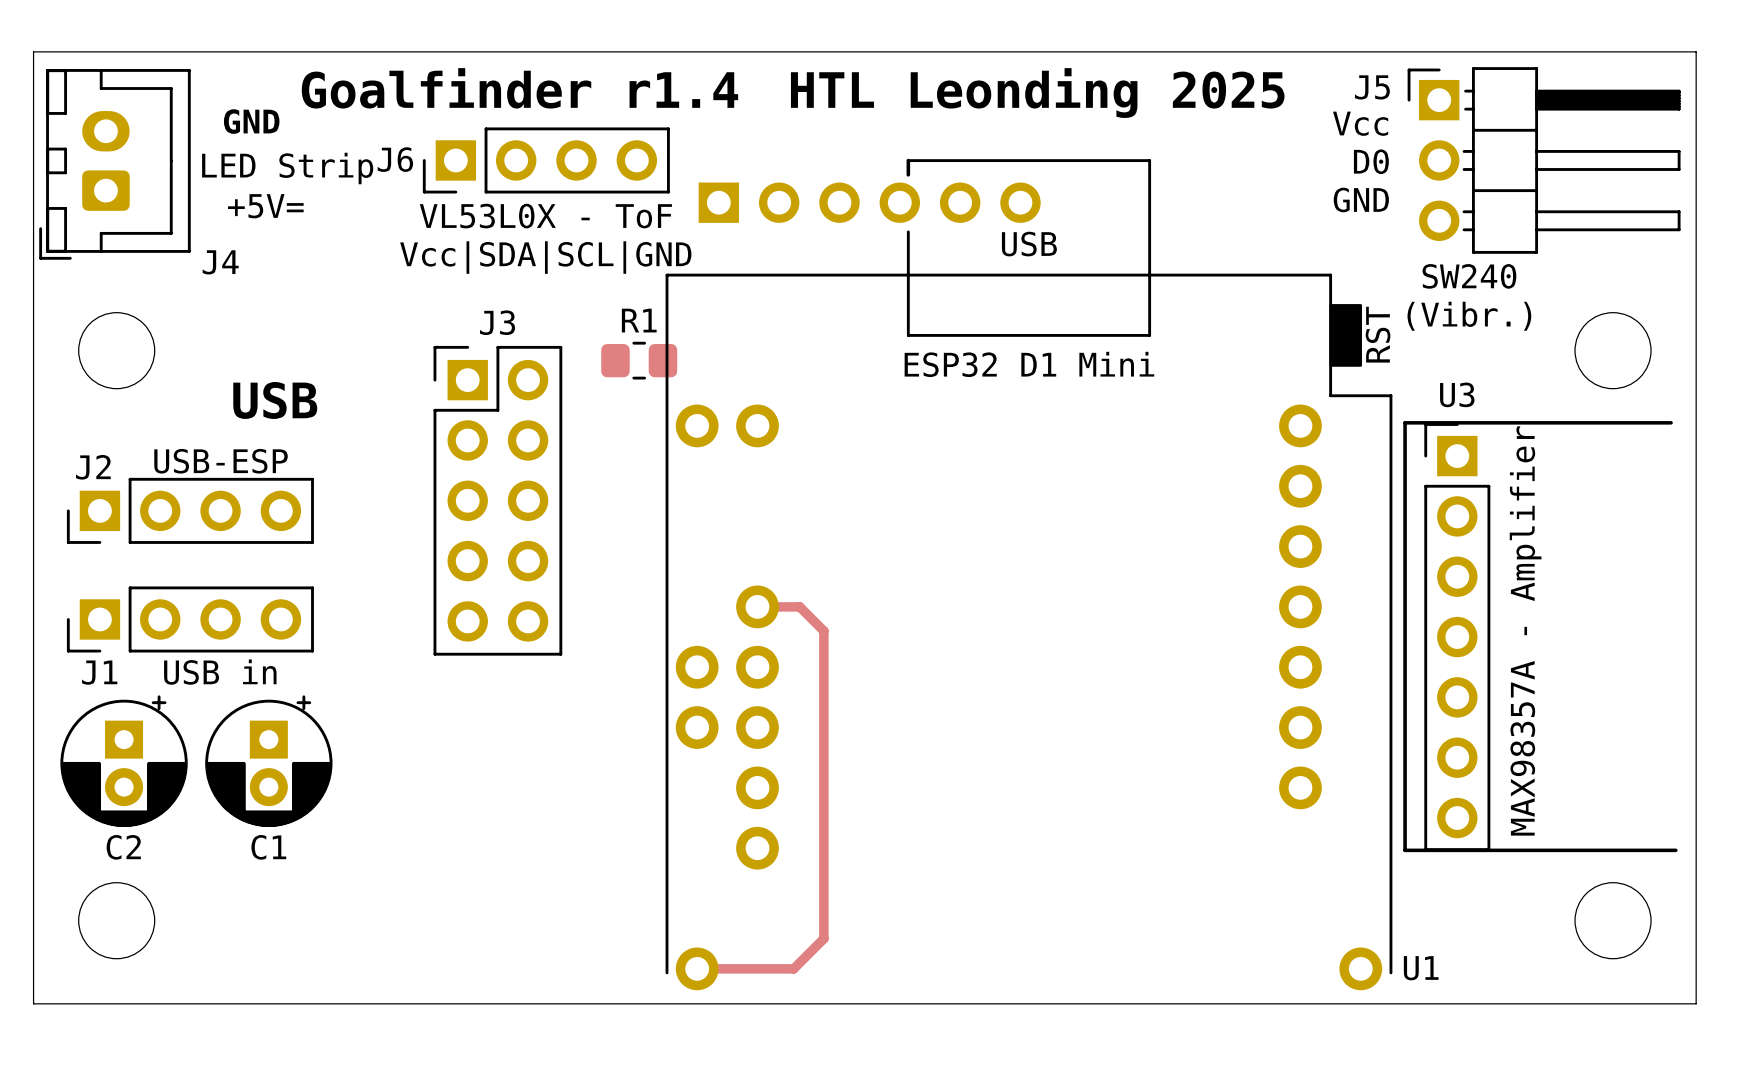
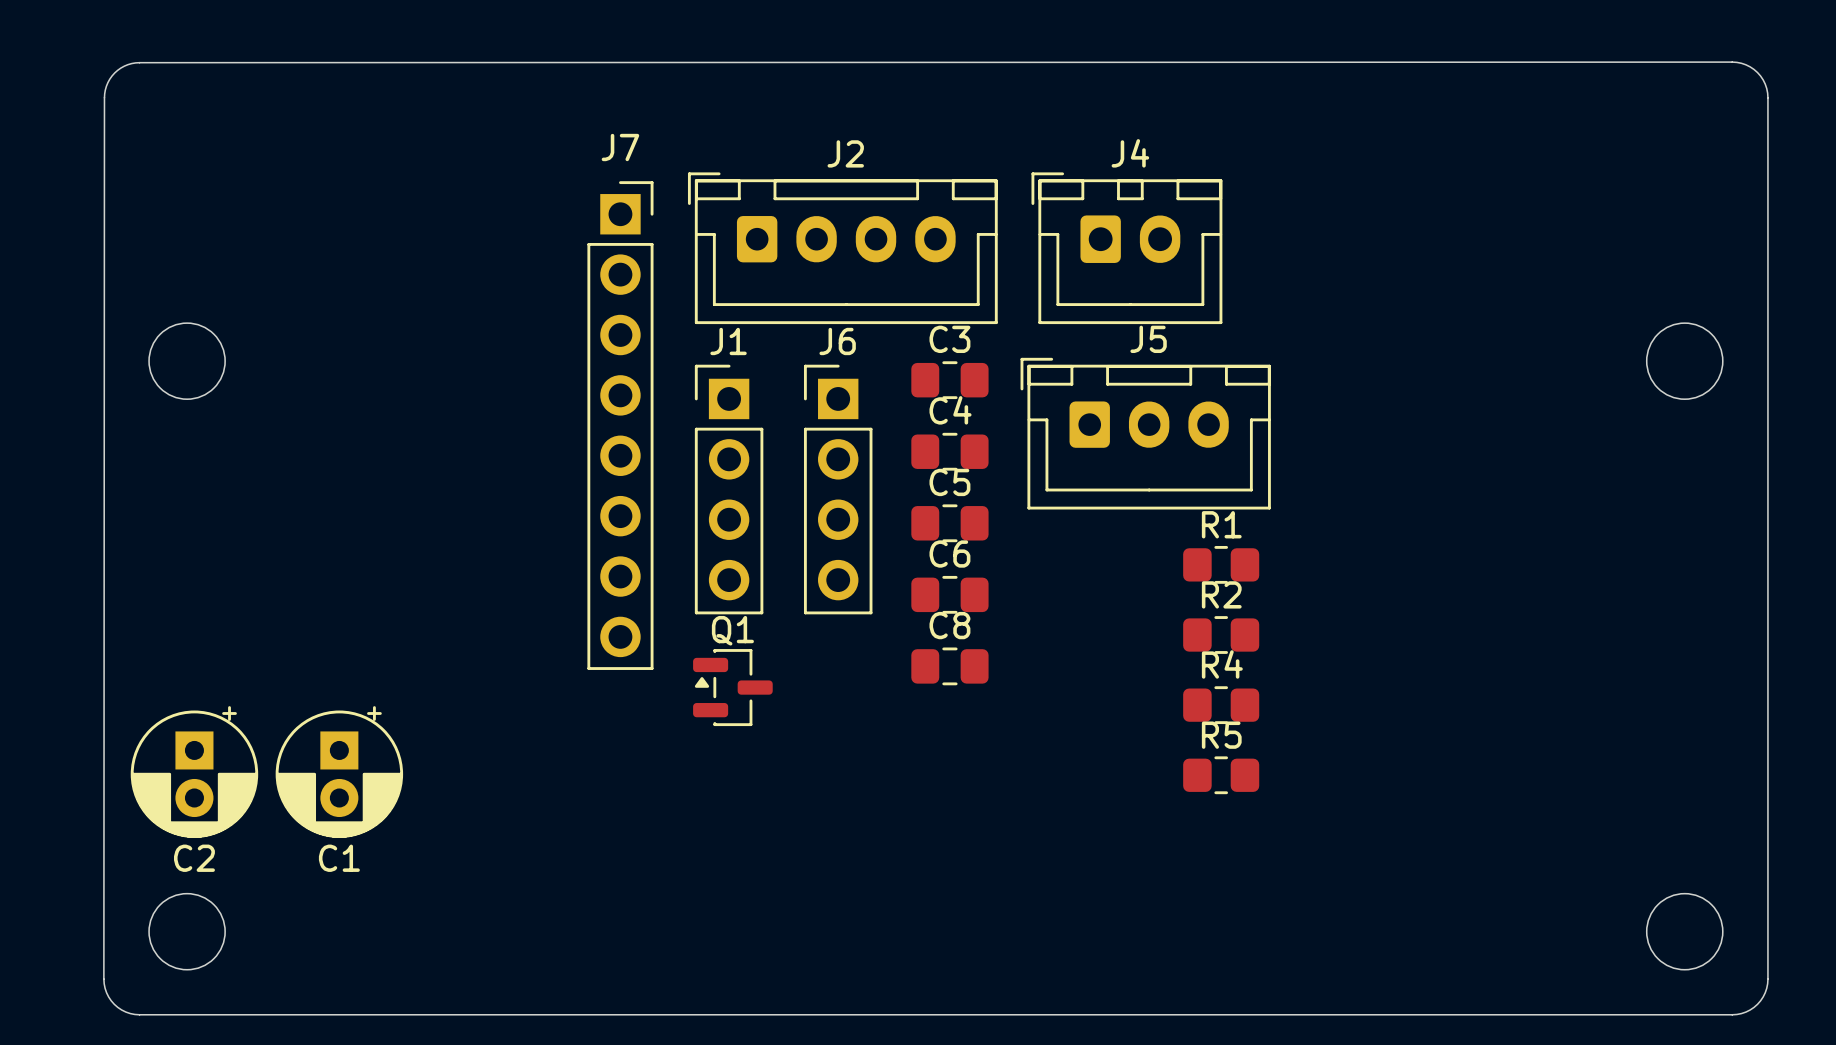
J5 footprint: [1407, 67, 1681, 254] -> [1020, 357, 1271, 510]
J5 name position: J5 (1372, 87) -> J5 (1148, 339)
board edge: (1696, 87) (1696, 51) (33, 51) (33, 1003) (1696, 1003) (1696, 968) -> (1767, 97) (1765, 84) (1757, 72) (1745, 64) (1732, 62) (139, 62) (124, 66) (109, 79) (104, 97) (103, 979) (106, 992) (114, 1004) (125, 1012) (139, 1014) (1732, 1014) (1745, 1012) (1757, 1004) (1765, 992) (1767, 979)
text: Goalfinder r1.4 (519, 88) -> none
text: HTL Leonding 2025 (1037, 93) -> none
text: GND (251, 121) -> none
text: Vcc (1360, 123) -> none
J6 footprint: [422, 127, 670, 194] -> [803, 364, 873, 615]
J6 name position: J6 (395, 159) -> J6 (837, 341)
text: D0 (1371, 161) -> none
J4 rotation: 0° (114, 164) -> 90° clockwise (1126, 248)
J4 position: (114, 164) -> (1126, 248)
J4 value: LED Strip (287, 168) -> none
text: GND (1361, 200) -> none
part: (869, 202) -> none
text: +5V= (265, 206) -> none
text: VL53L0X - ToF (545, 216) -> none
text: Vcc|SDA|SCL|GND (545, 257) -> none
J4 name position: J4 (220, 262) -> J4 (1130, 153)
text: SW240 (1469, 276) -> none
text: (Vibr.) (1469, 316) -> none
R1 position: (639, 360) -> (1221, 564)
C3: none -> (949, 380)
text: USB (275, 400) -> none
J7: none -> (620, 425)
C4: none -> (949, 451)
J2 value: USB-ESP (221, 461) -> none
J2 name position: J2 (93, 467) -> J2 (845, 153)
J2 footprint: [66, 477, 314, 544] -> [687, 172, 998, 325]
J3: (497, 500) -> none
C5: none -> (949, 523)
U1: ESP32 D1 Mini (1028, 574) -> none
C6: none -> (949, 594)
J1 footprint: [66, 586, 314, 653] -> [694, 364, 764, 615]
track: (757, 606) (799, 606) (823, 631) (823, 938) (793, 968) (697, 968) -> none
R2: none -> (1221, 635)
U3: MAX98357A - Amplifier (1540, 636) -> none
C8: none -> (949, 666)
J1 name position: J1 (99, 672) -> J1 (728, 341)
J1 value: USB in (220, 672) -> none
Q1: none -> (732, 687)
R4: none -> (1221, 705)
R5: none -> (1221, 775)

